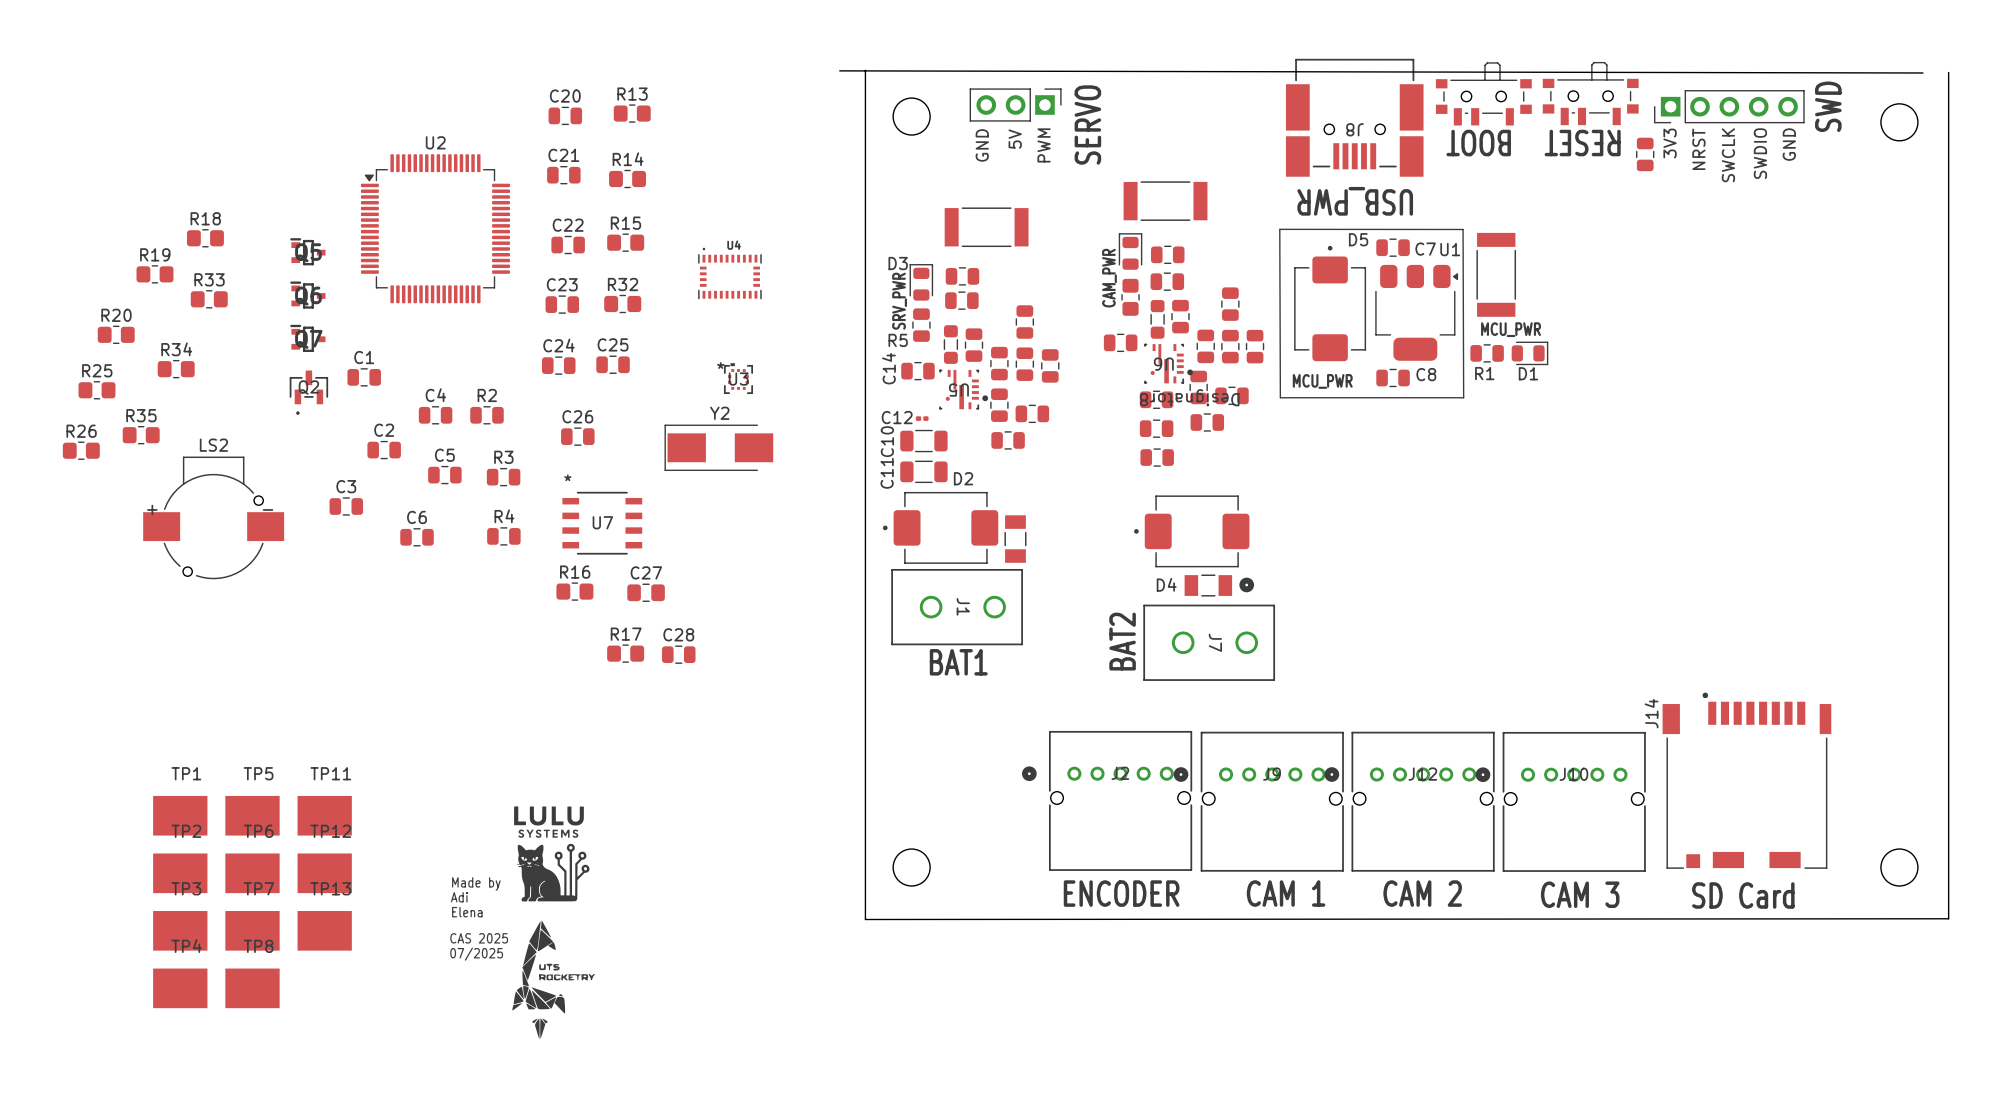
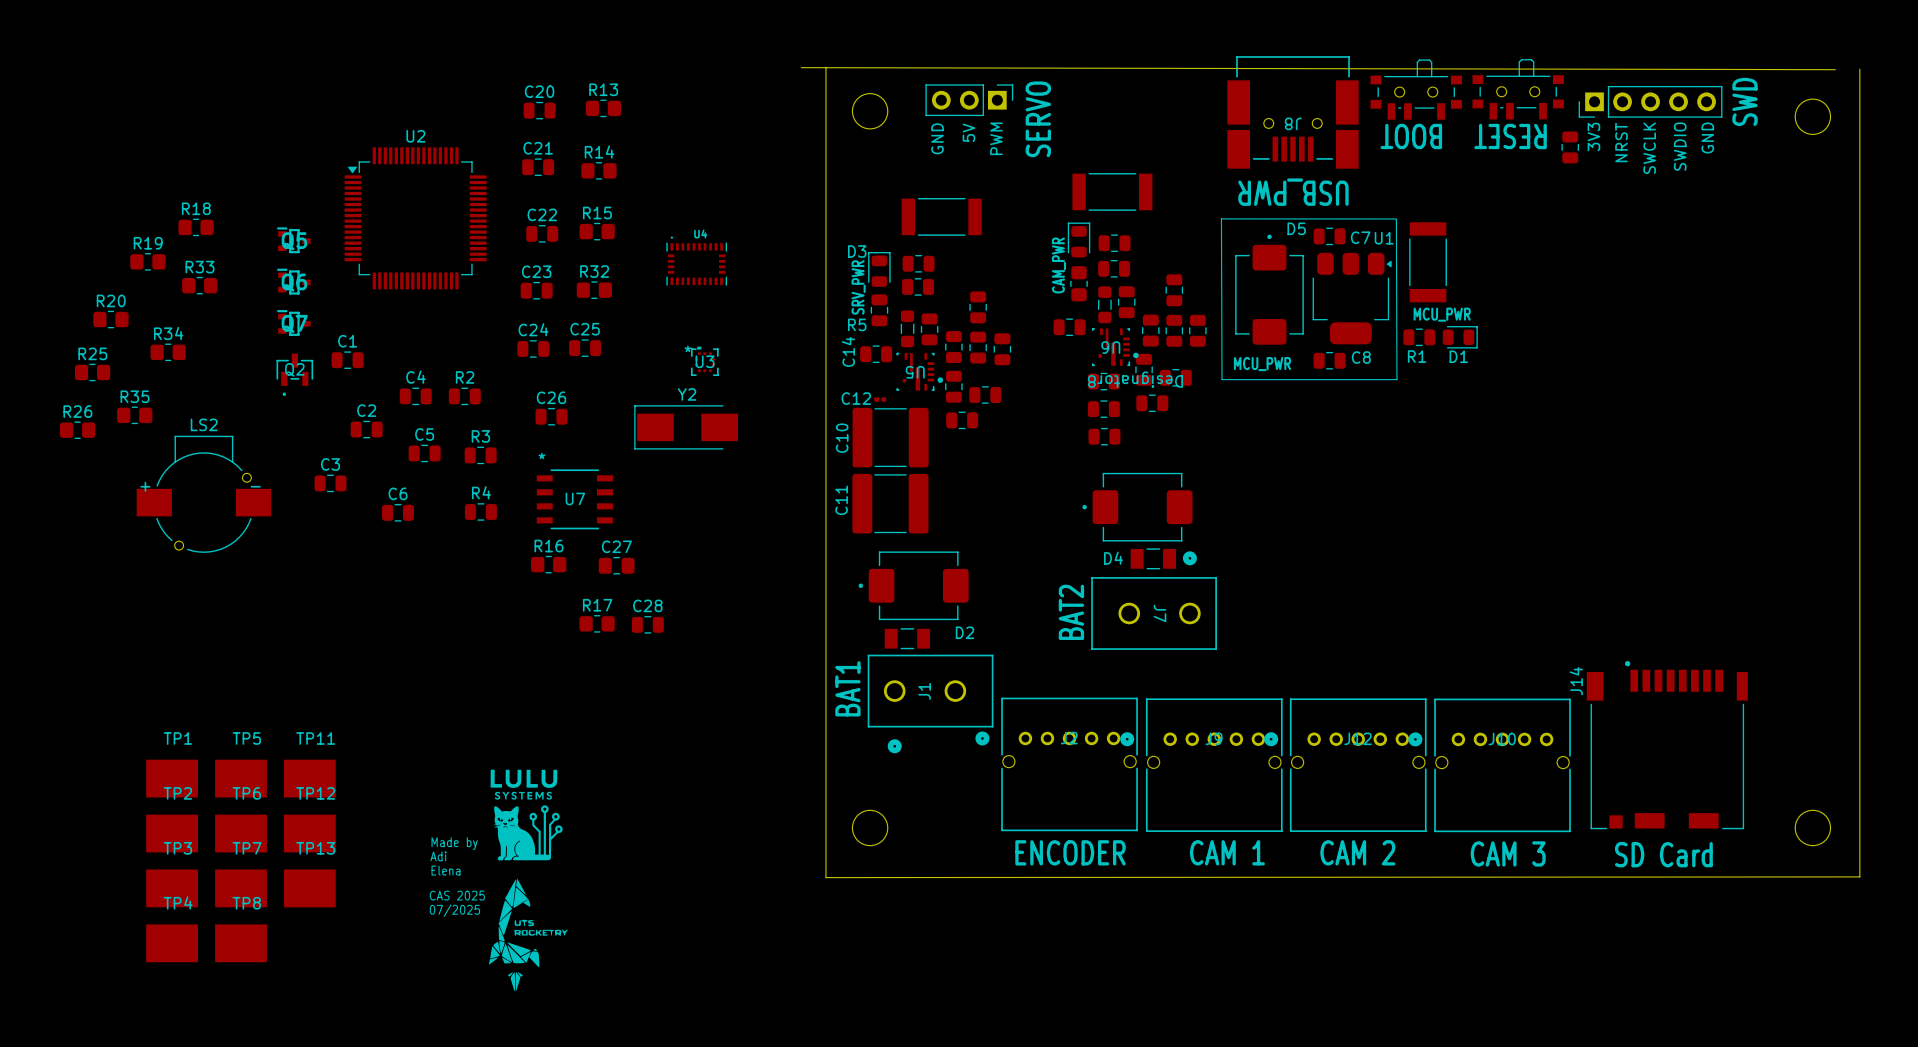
C10 footprint: [900, 429, 948, 453] -> [852, 407, 929, 468]
C11 footprint: [900, 460, 948, 484] -> [852, 473, 929, 534]
D2 name position: D2 (963, 478) -> D2 (965, 632)
D2 position: (940, 527) -> (913, 585)
part rotation: 0° (1015, 539) -> 90° clockwise (907, 638)
part position: (1015, 539) -> (907, 638)
J1 footprint: [891, 568, 1023, 646] -> [867, 654, 994, 754]
text rotation: 0° (958, 662) -> 90° counterclockwise (847, 688)
text position: BAT1 (958, 662) -> BAT1 (847, 688)

